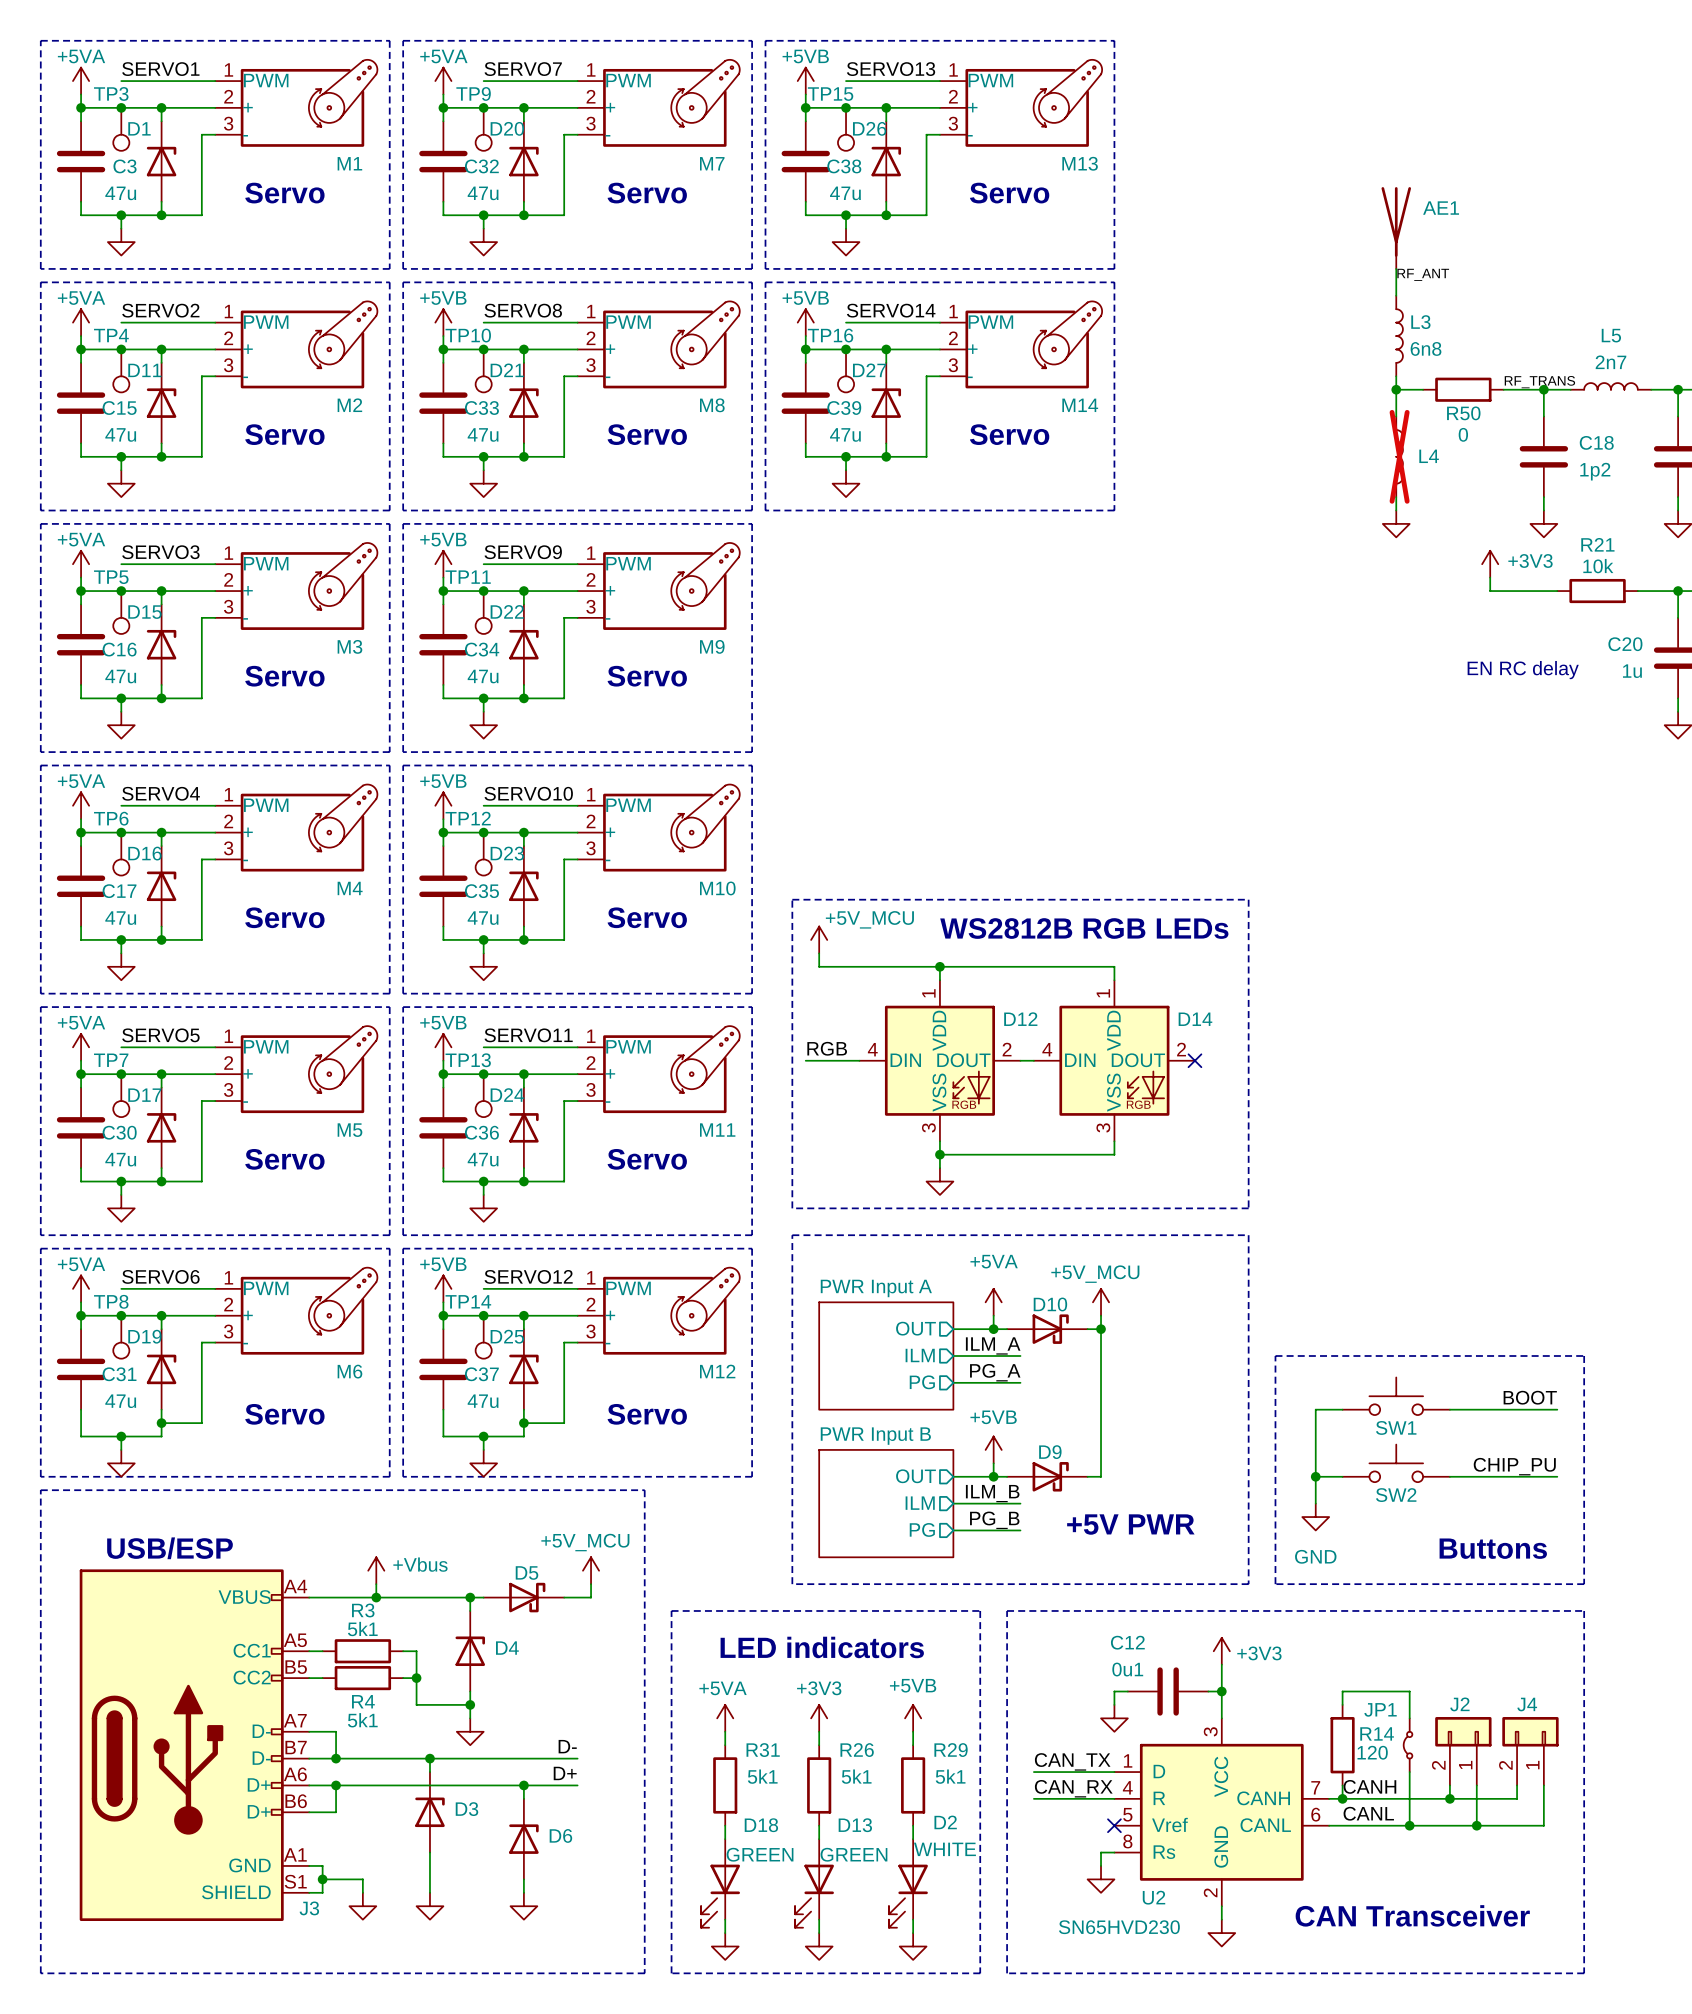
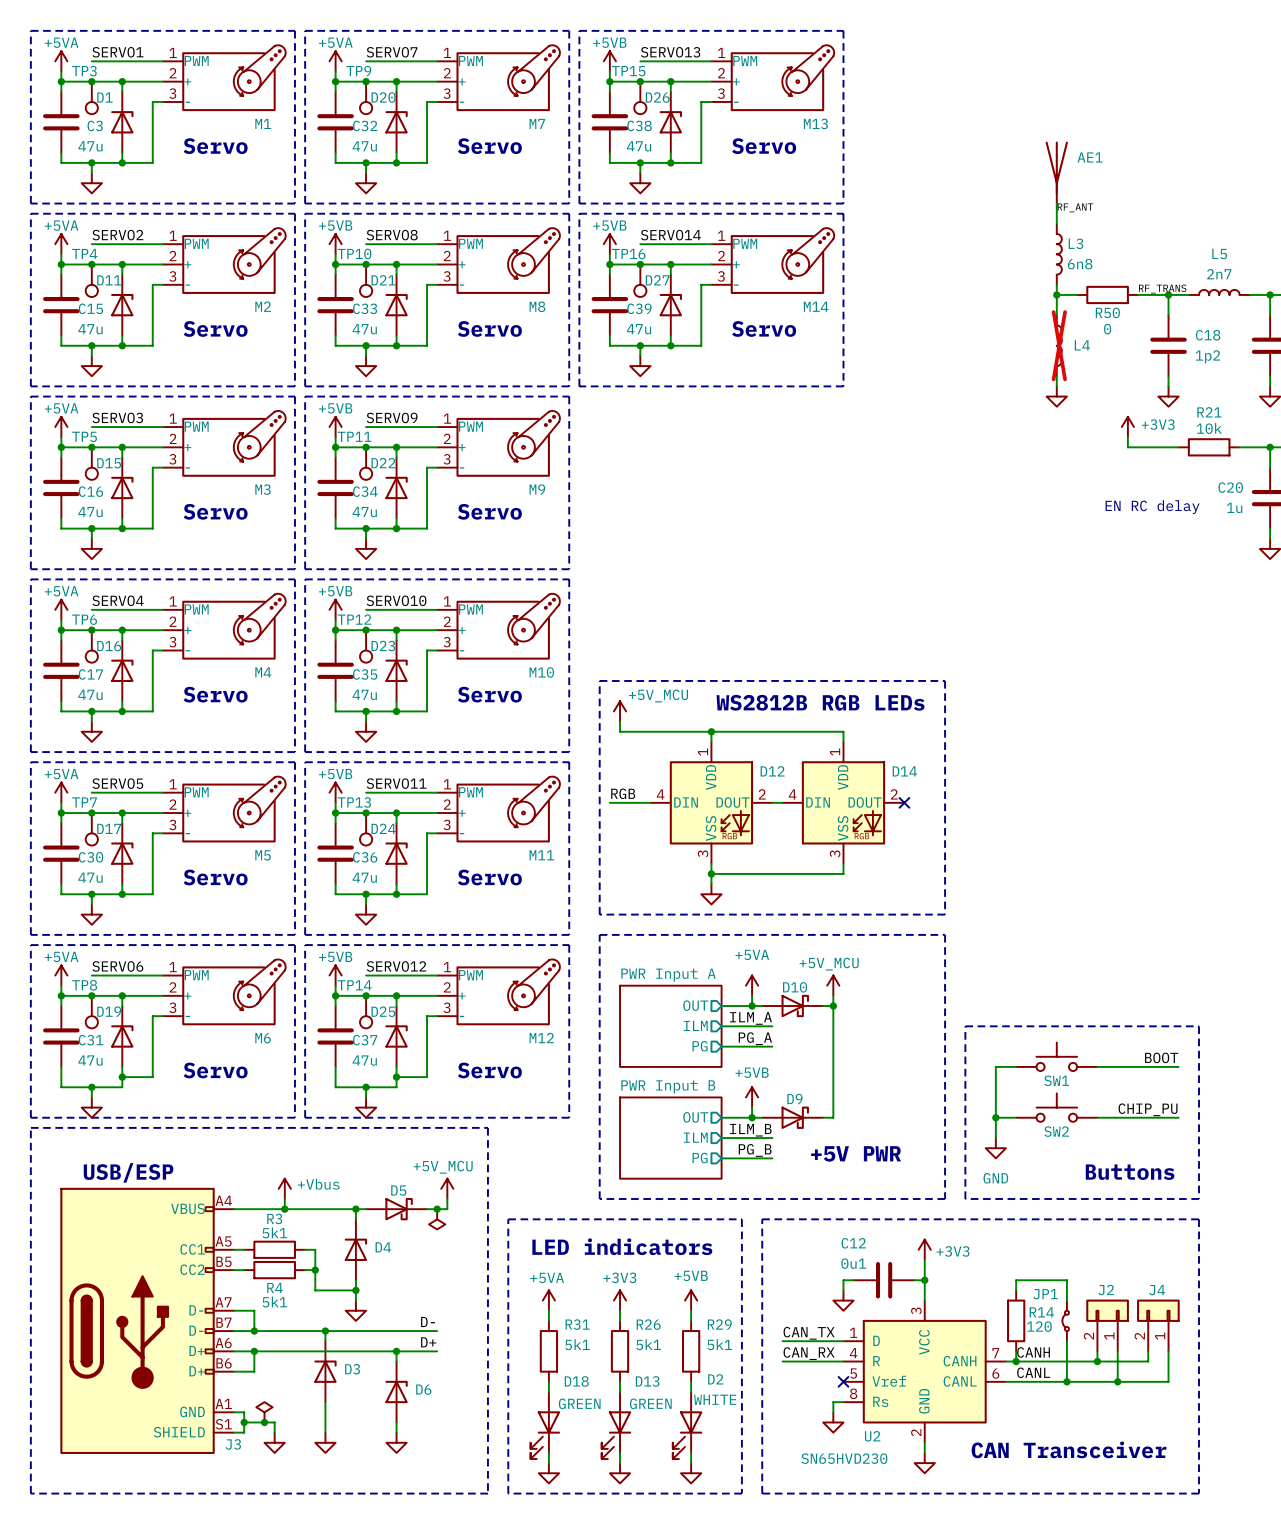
junction: none -> (437, 1209)
power symbol: none -> (437, 1219)
power symbol: none -> (264, 1412)
junction: none -> (264, 1422)

